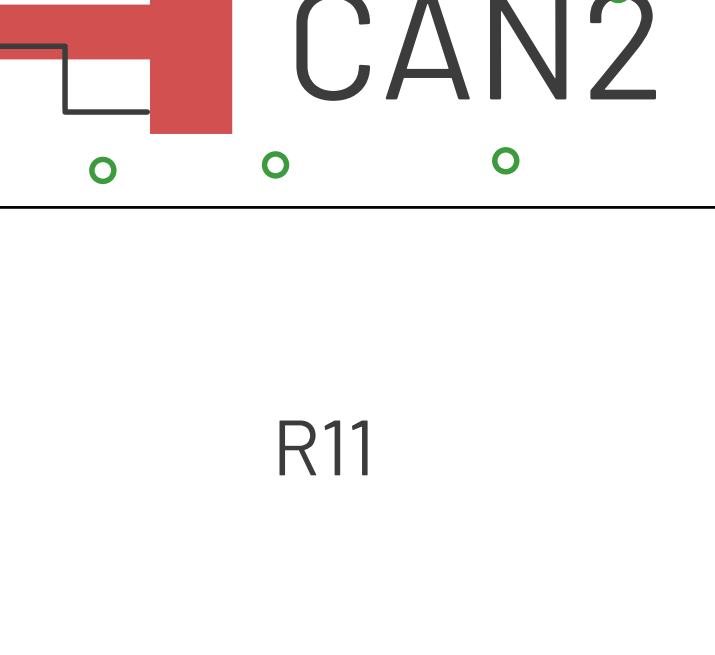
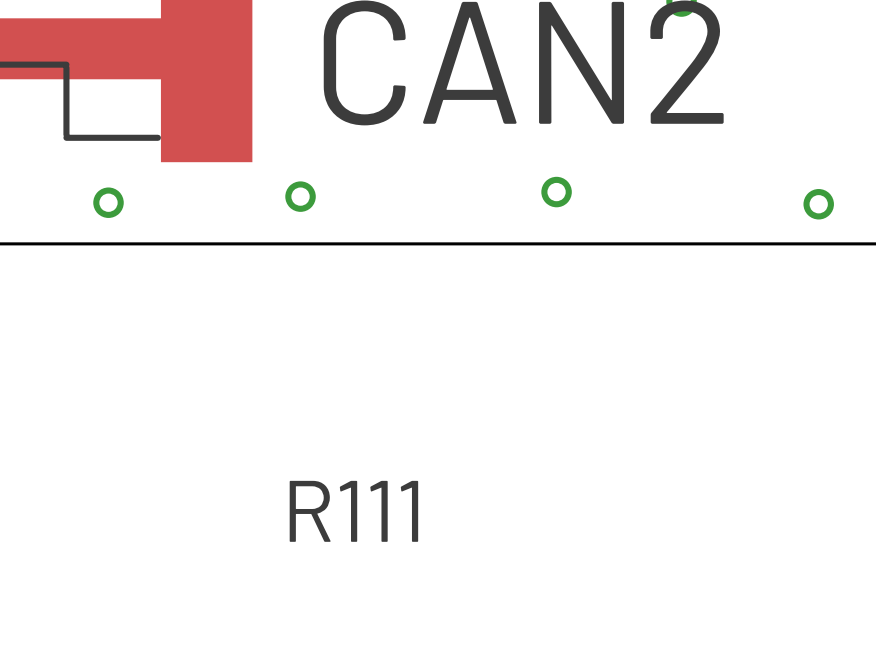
R11 name: R11 (323, 447) -> R111 (353, 511)

